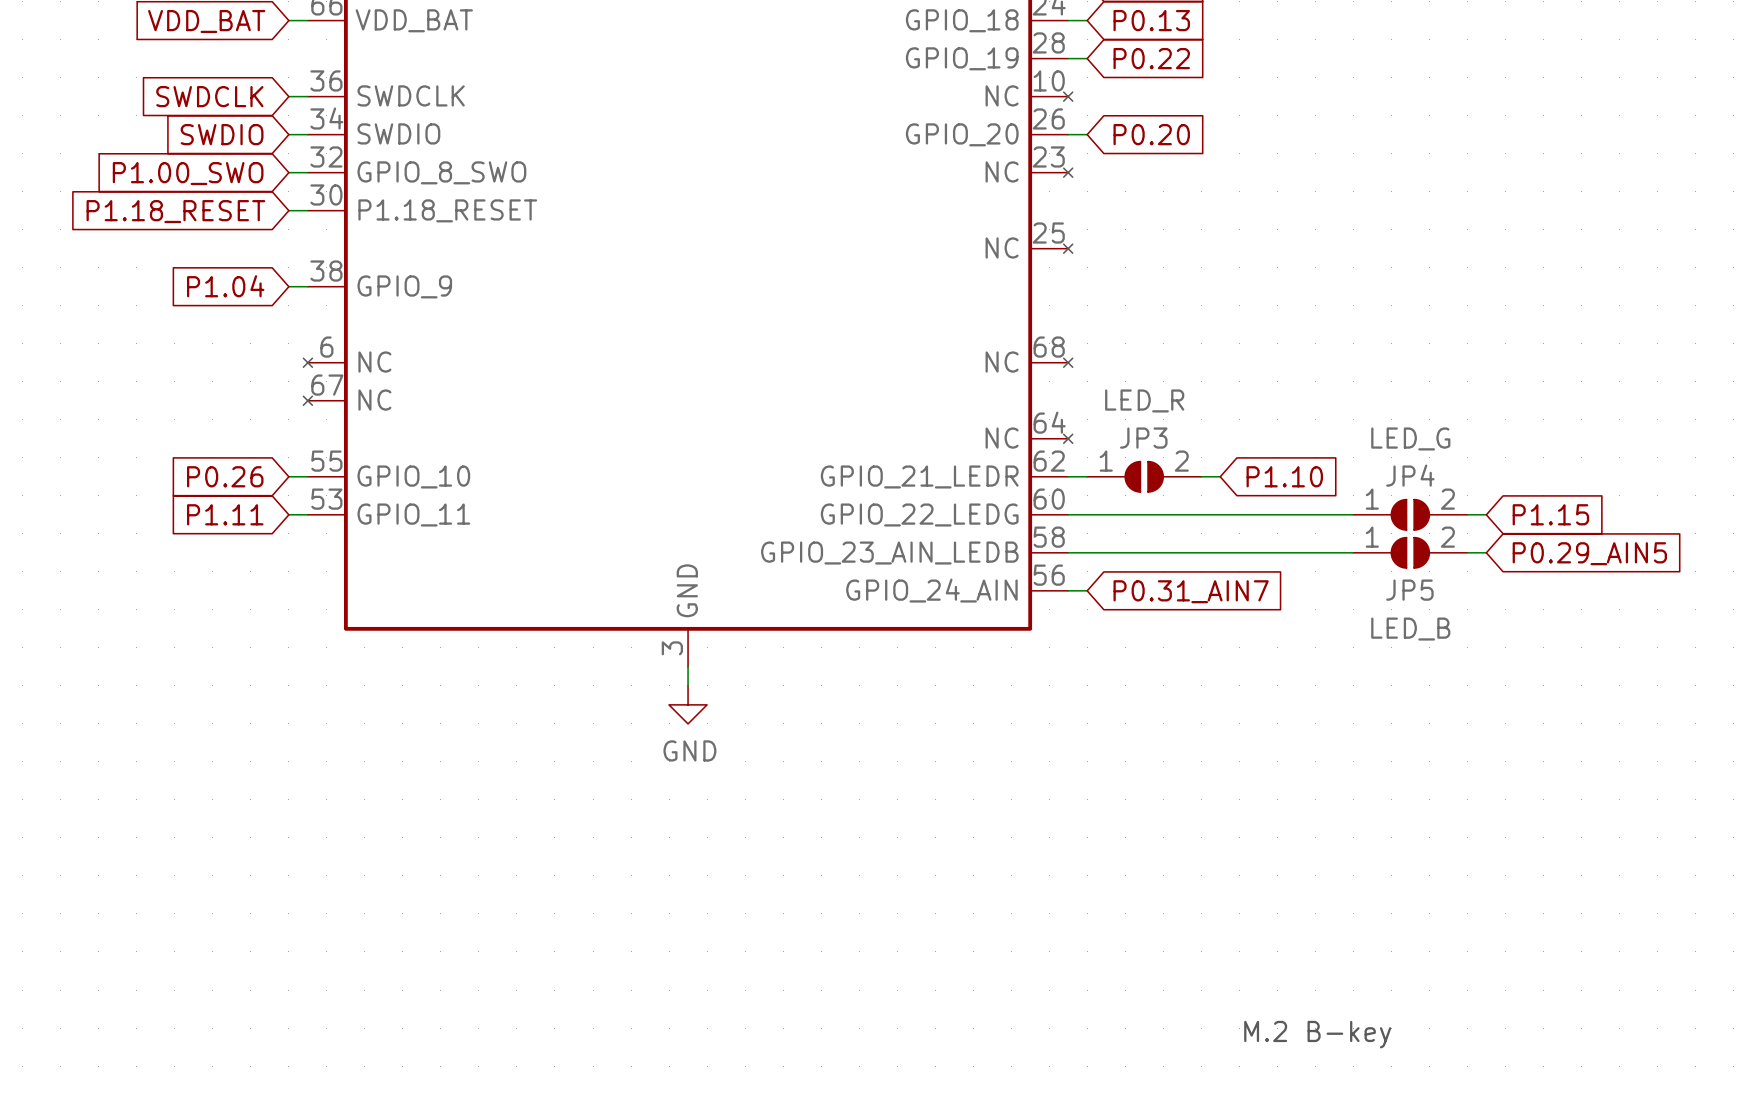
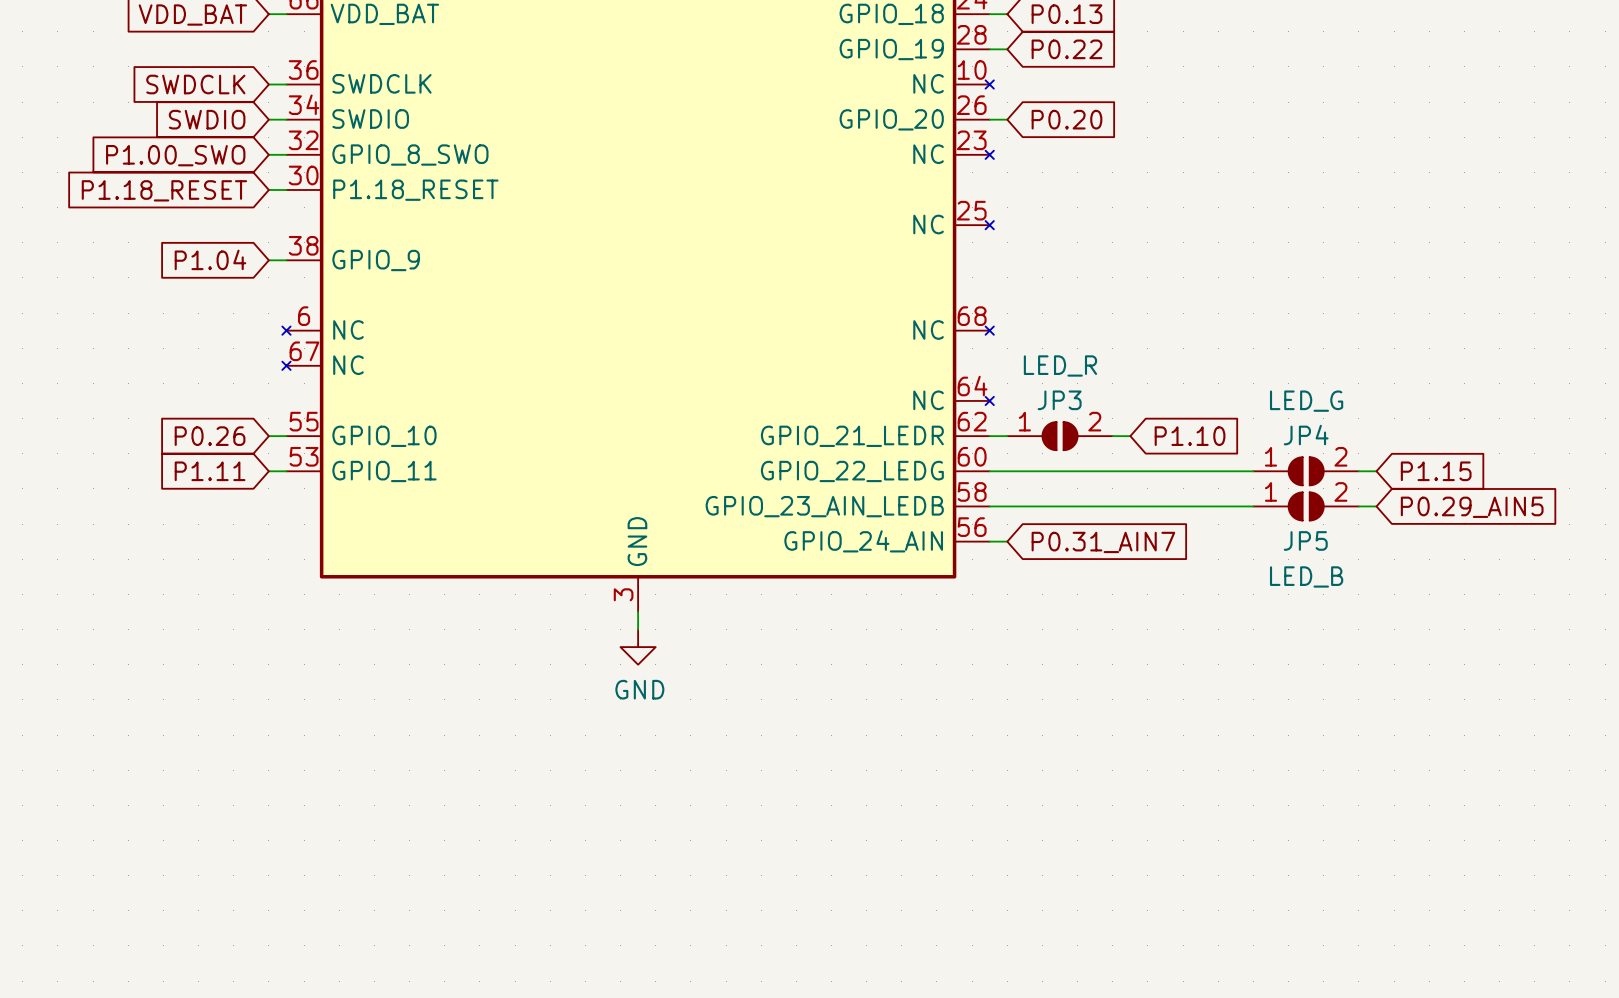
text: M.2 B-key (1317, 1034) -> none

